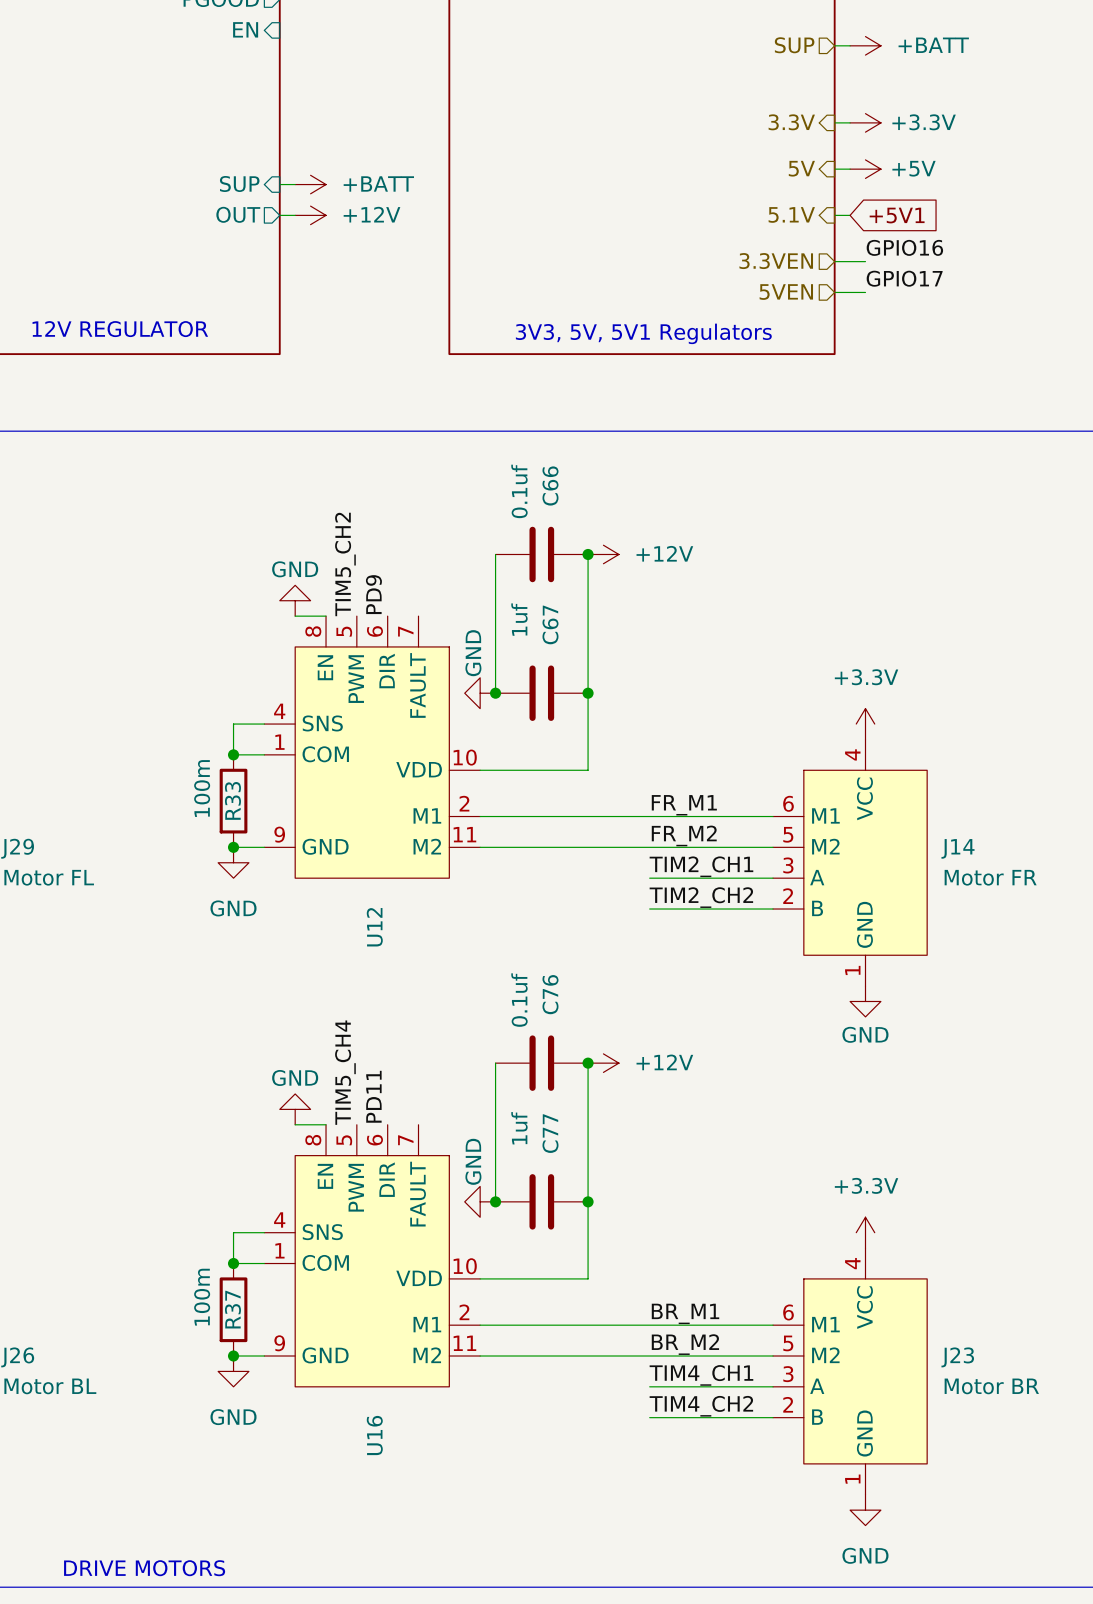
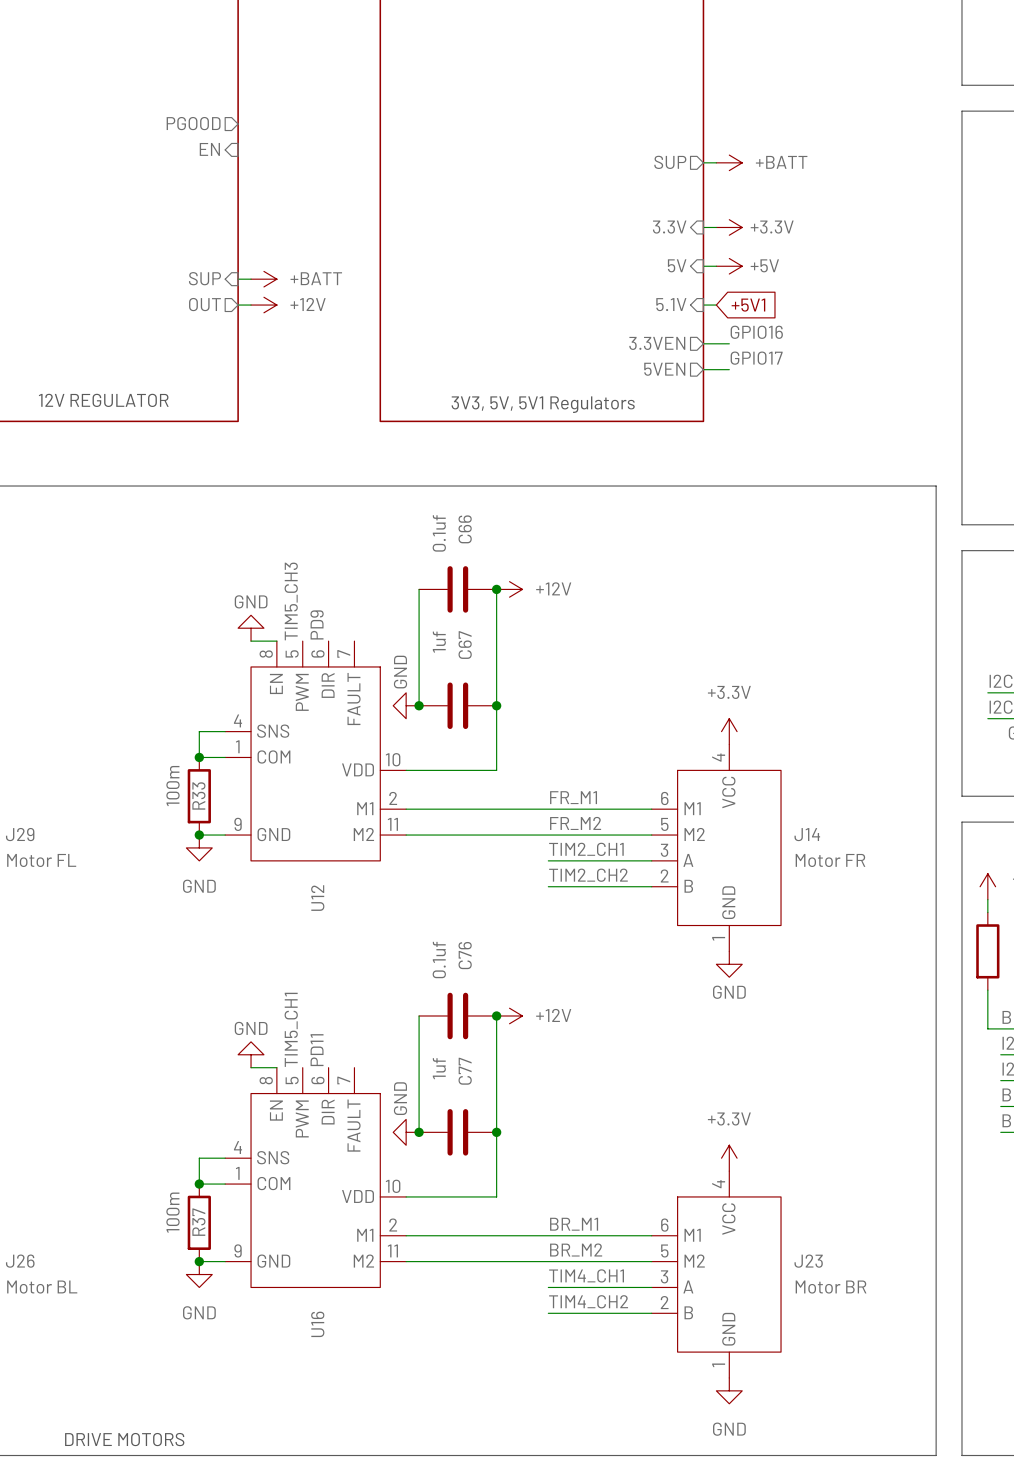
label: TIM5_CH2 (345, 564) -> TIM5_CH3 (291, 601)
label: TIM5_CH4 (345, 1072) -> TIM5_CH1 (291, 1029)

